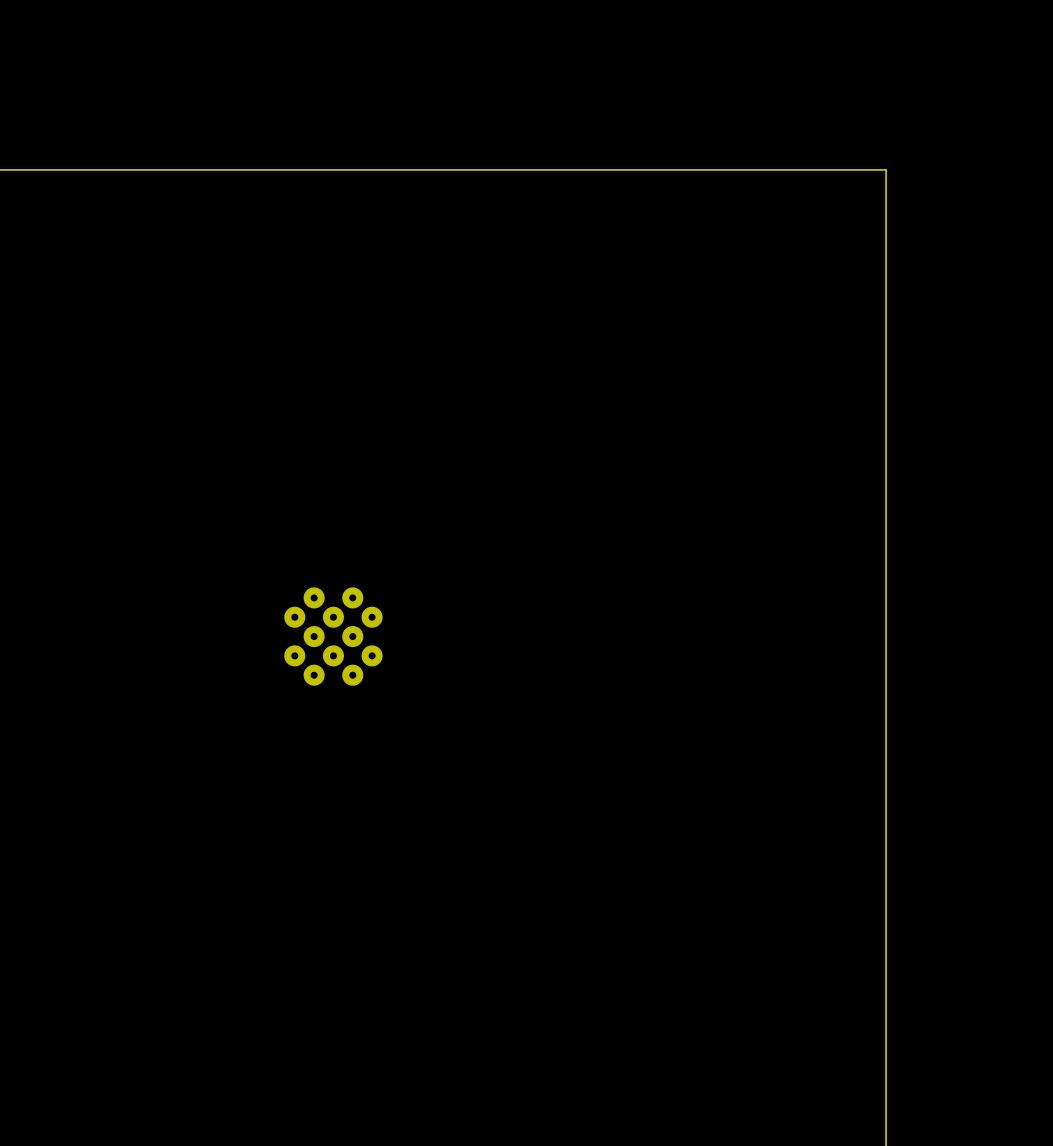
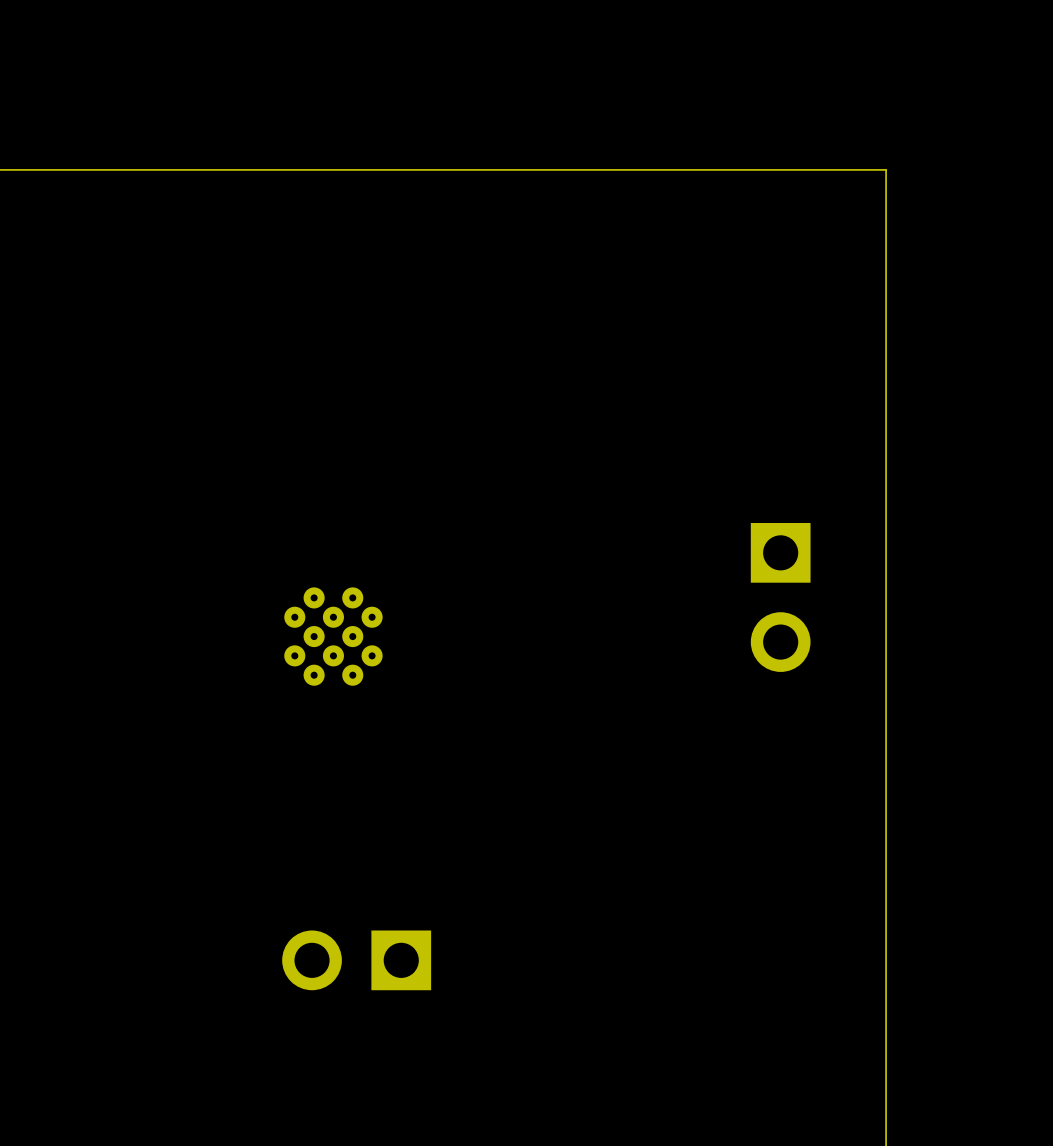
part: none -> (780, 597)
part: none -> (356, 960)

